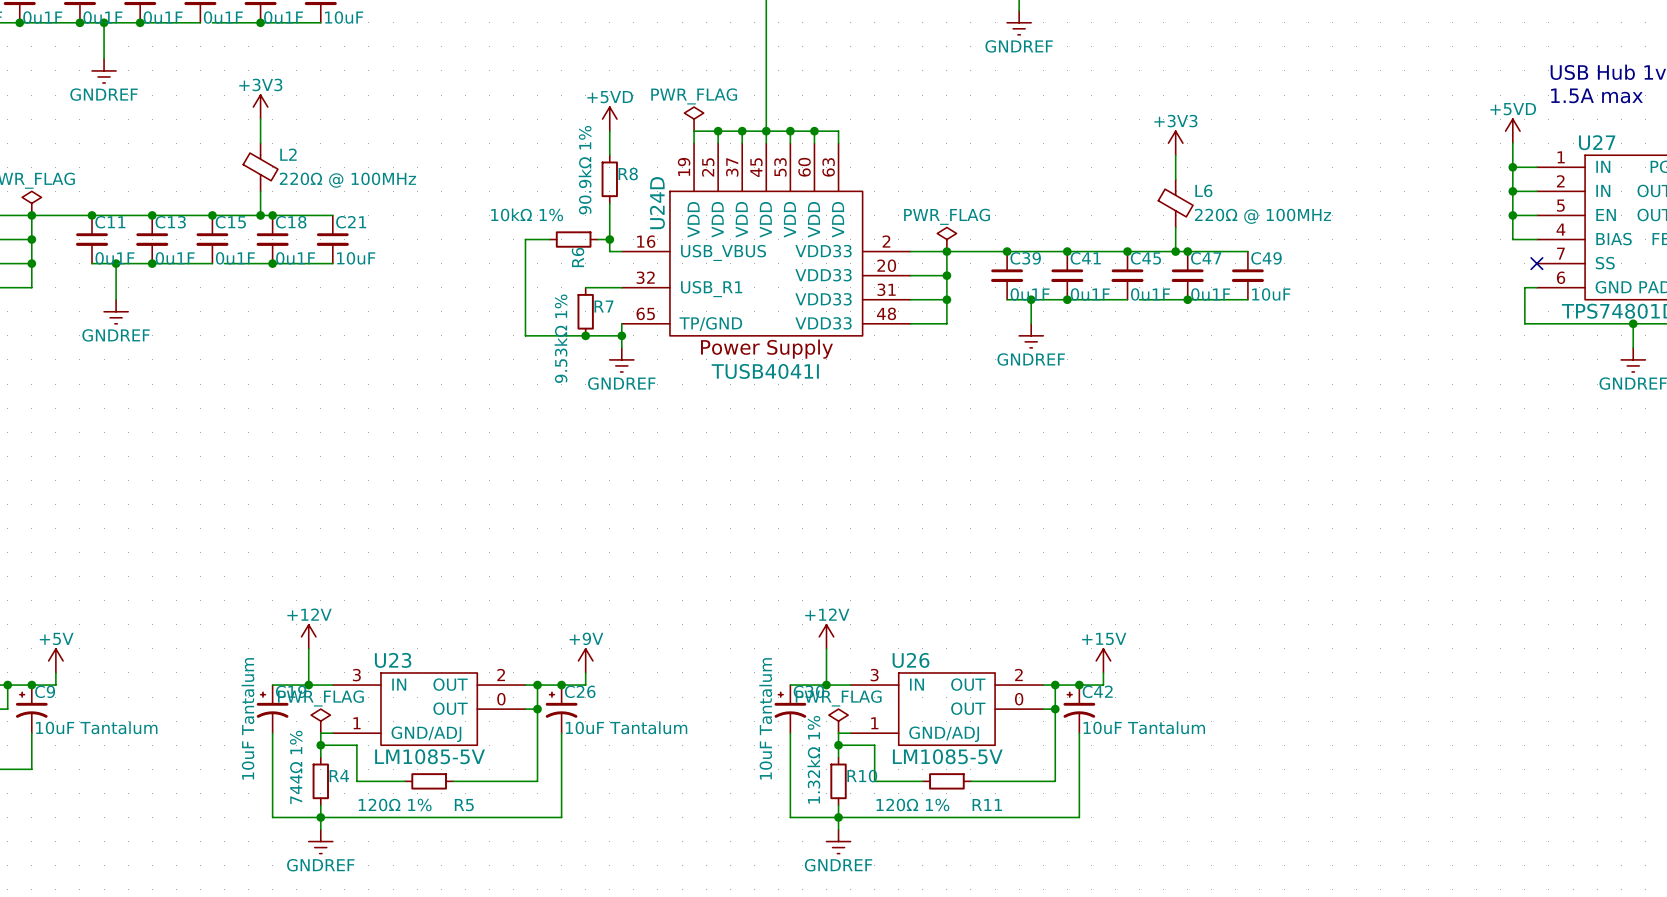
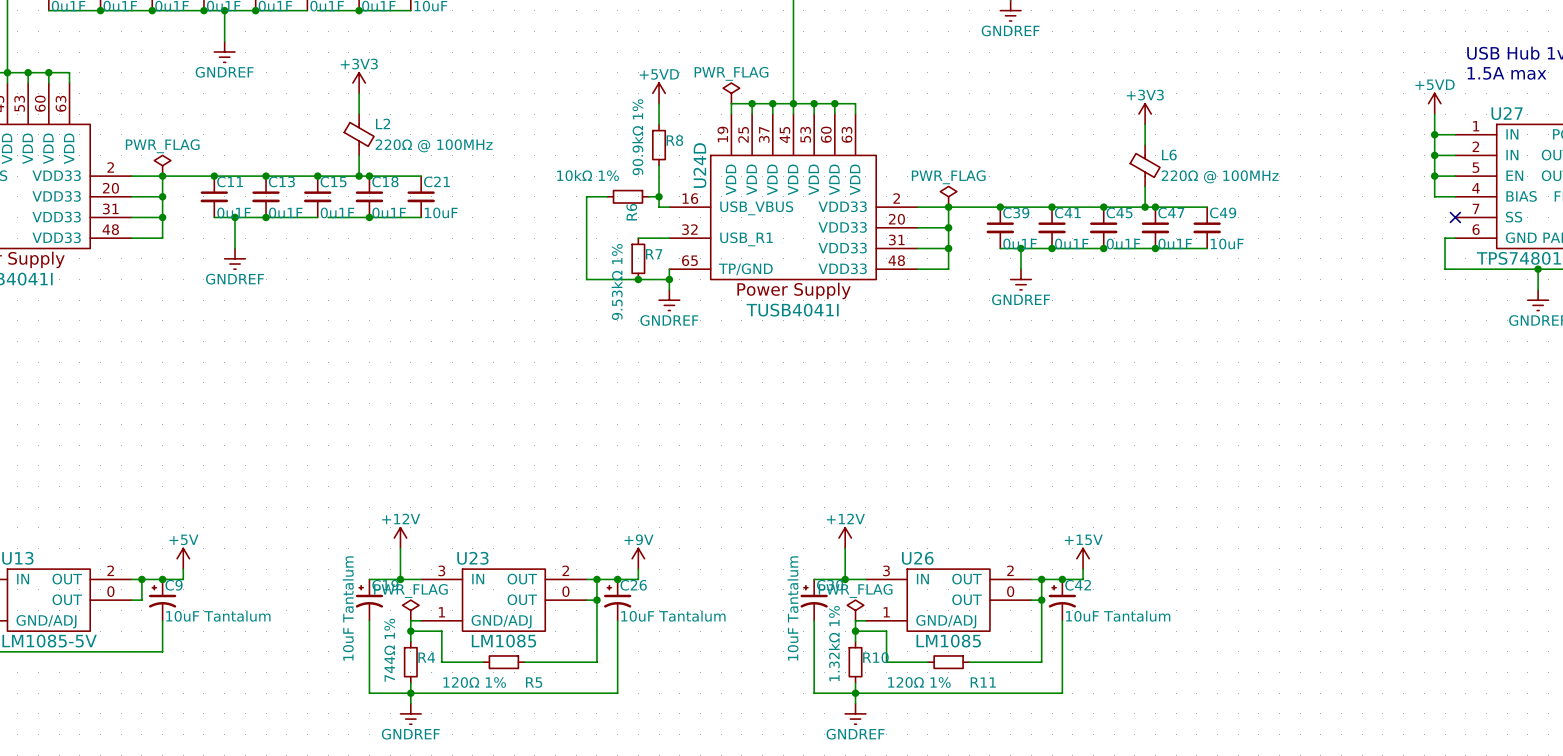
junction: none -> (1103, 248)
U23 value: LM1085-5V (430, 756) -> LM1085 (503, 641)
U26 value: LM1085-5V (947, 756) -> LM1085 (948, 641)

